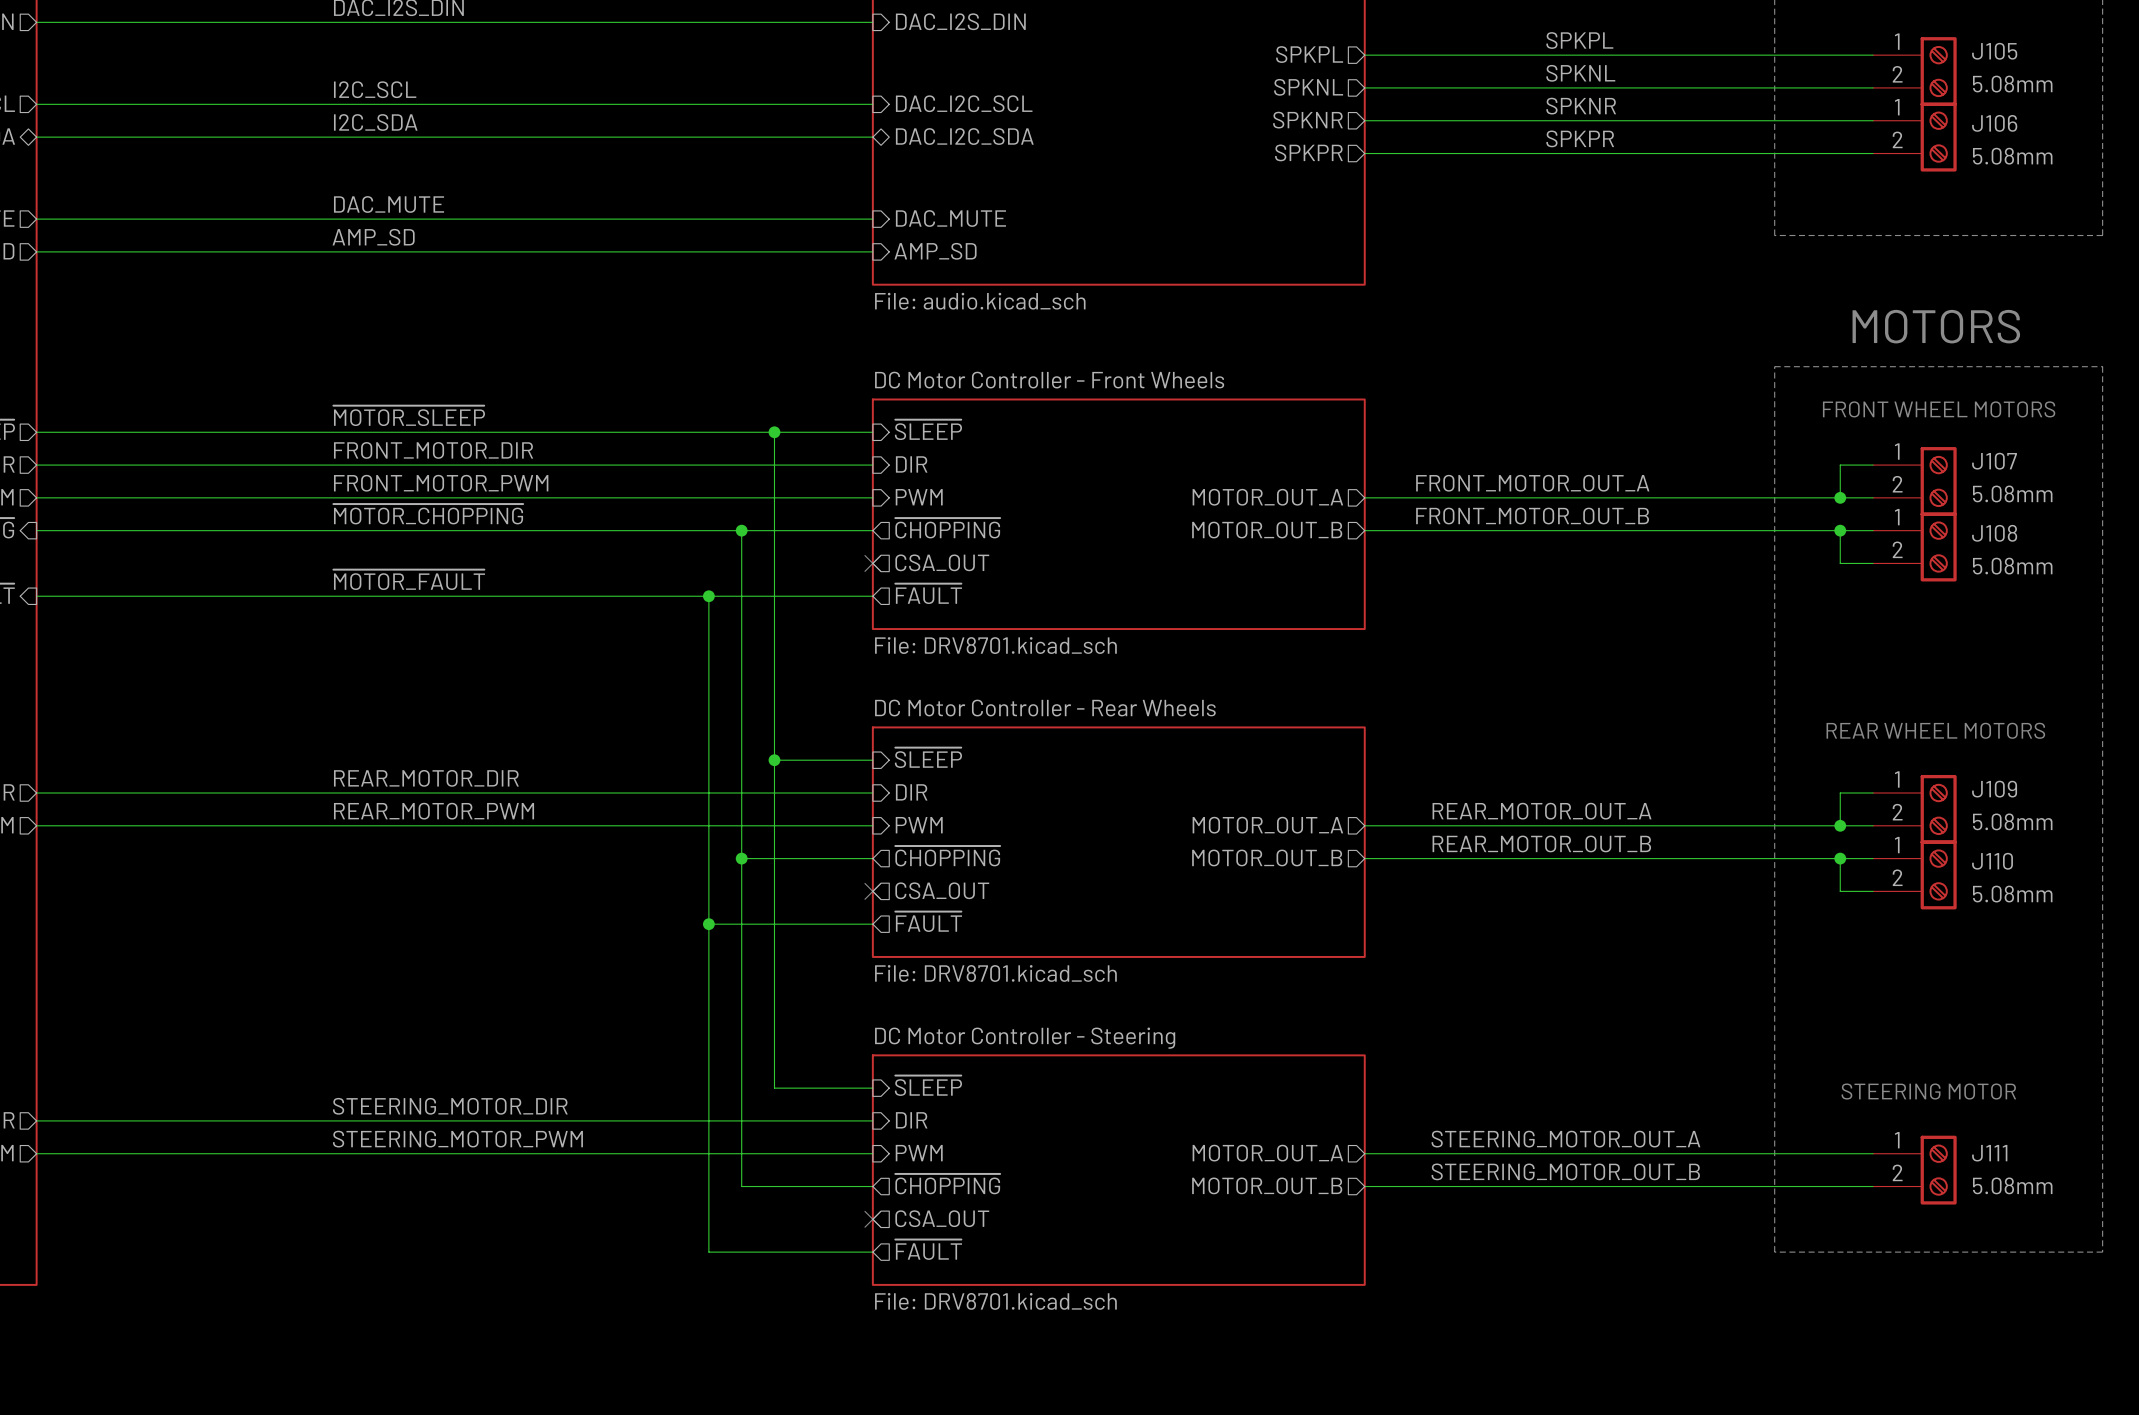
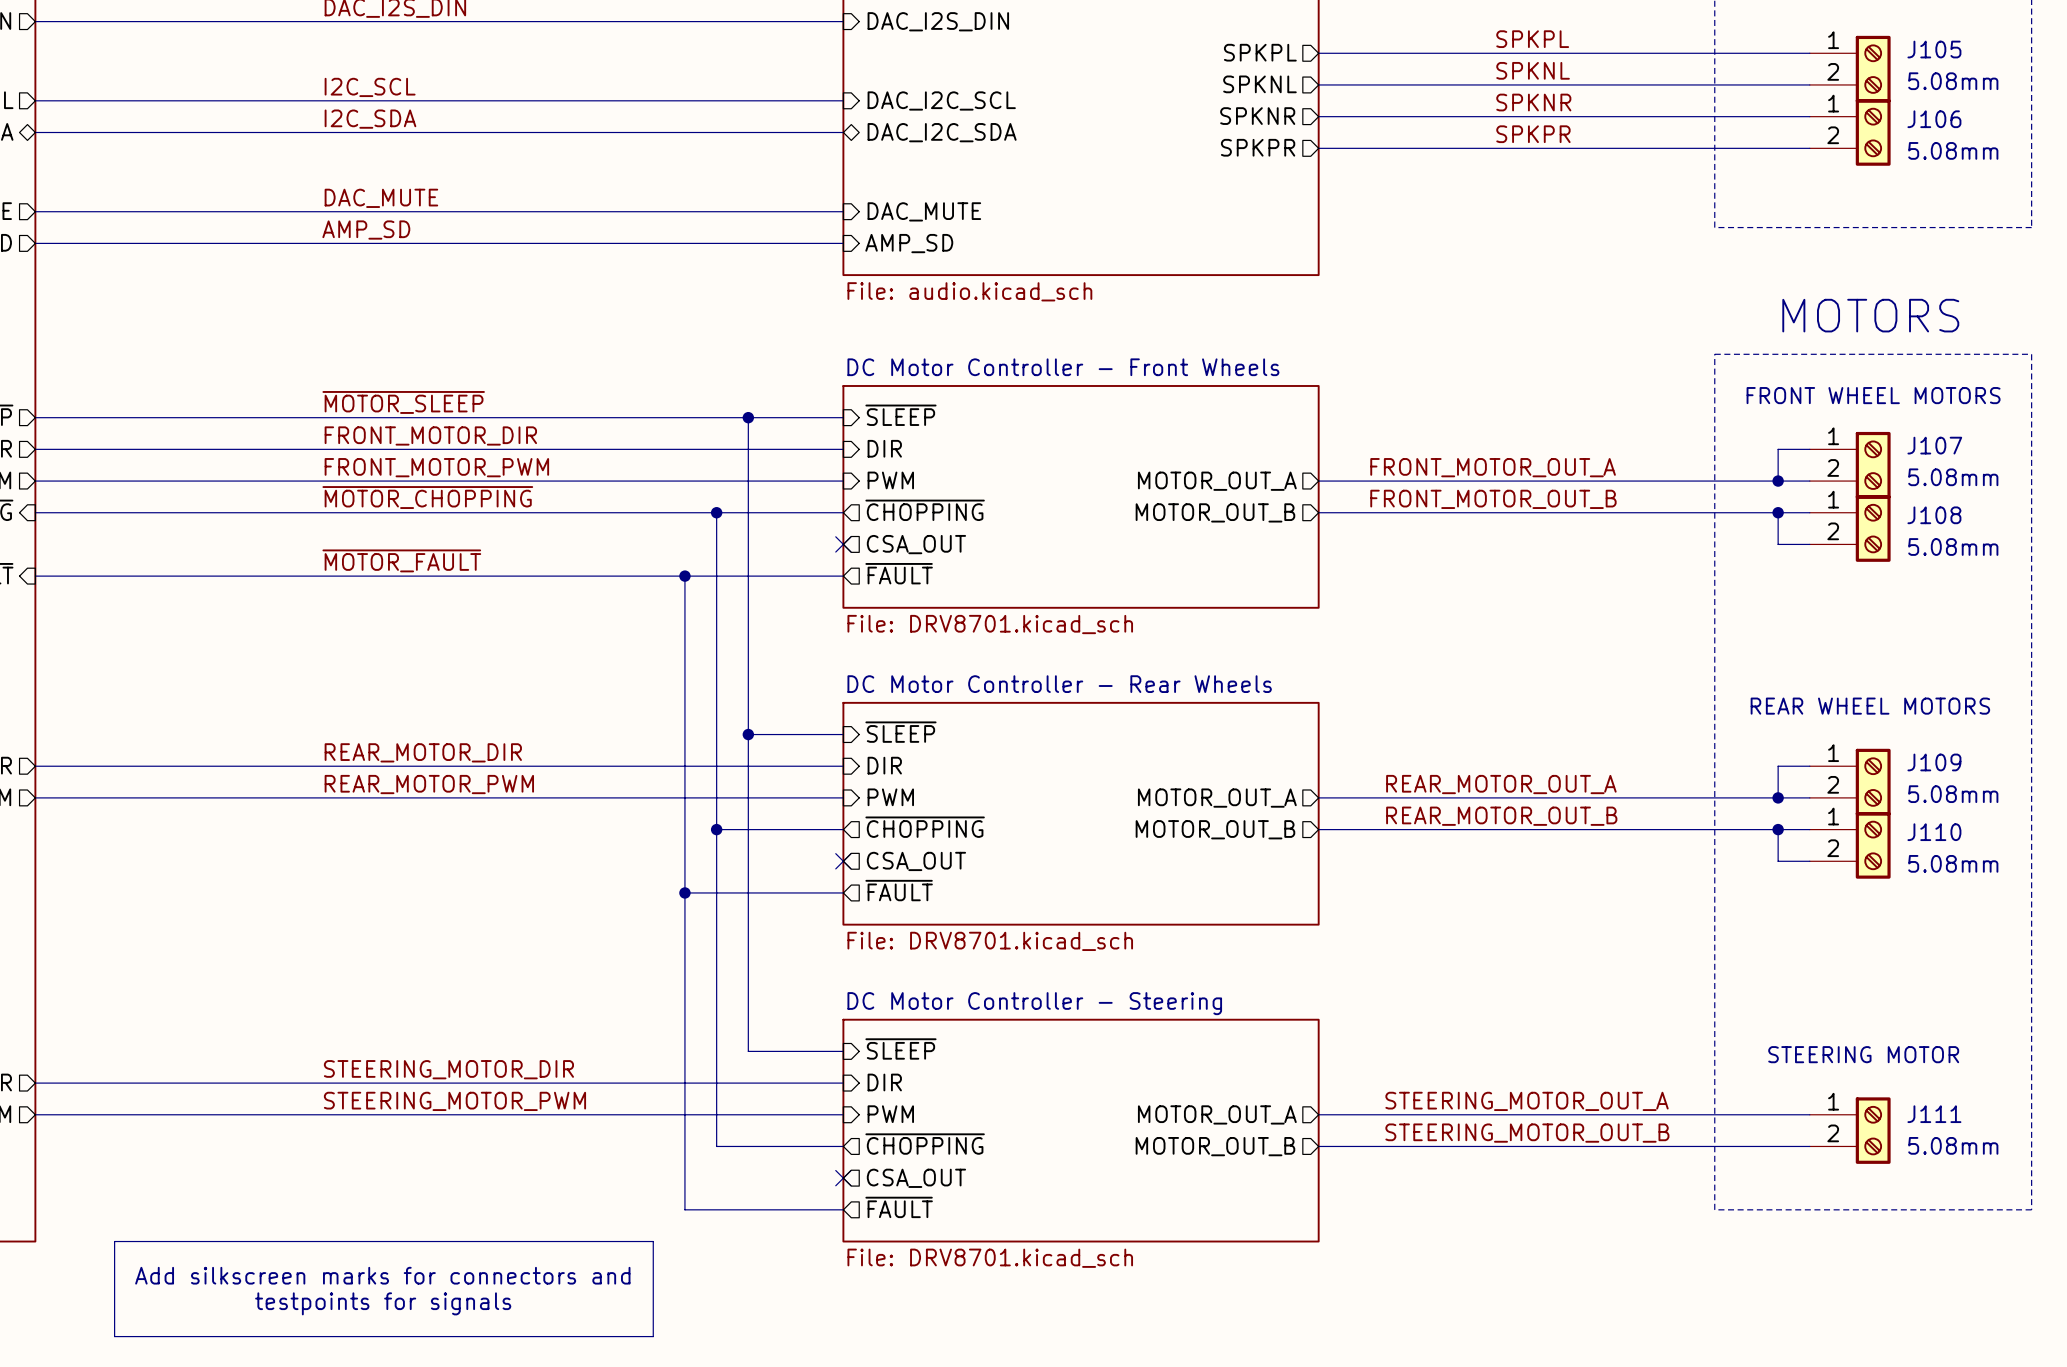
line: none -> (114, 1241) (653, 1241) (653, 1336) (114, 1336) (114, 1241)
text: none -> Add silkscreen marks for connectors and (382, 1275)
text: none -> testpoints for signals (383, 1303)

